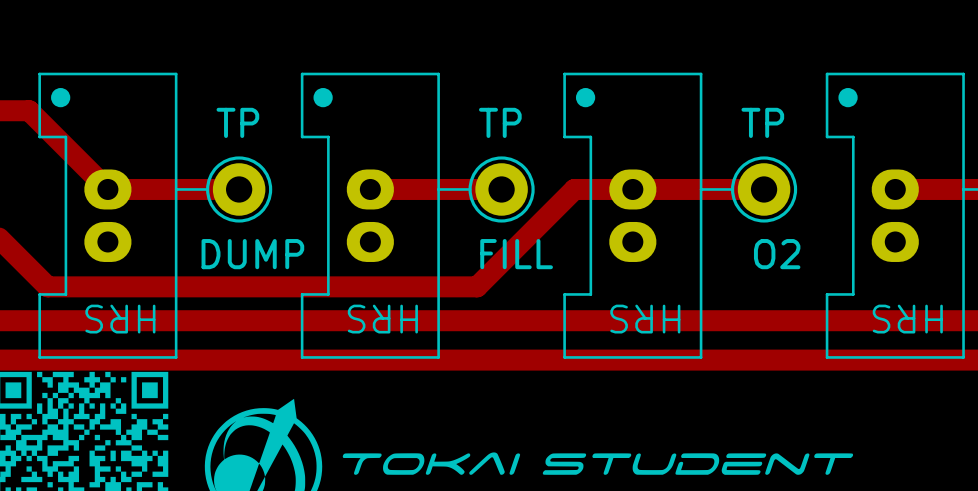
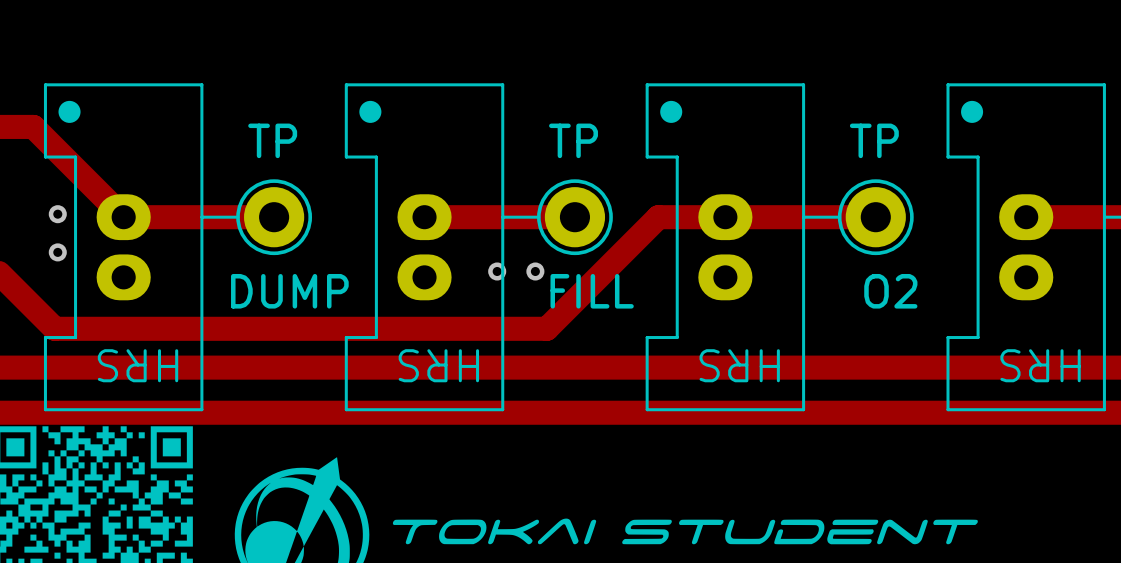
via: none -> (57, 214)
via: none -> (57, 252)
via: none -> (497, 271)
via: none -> (535, 271)

